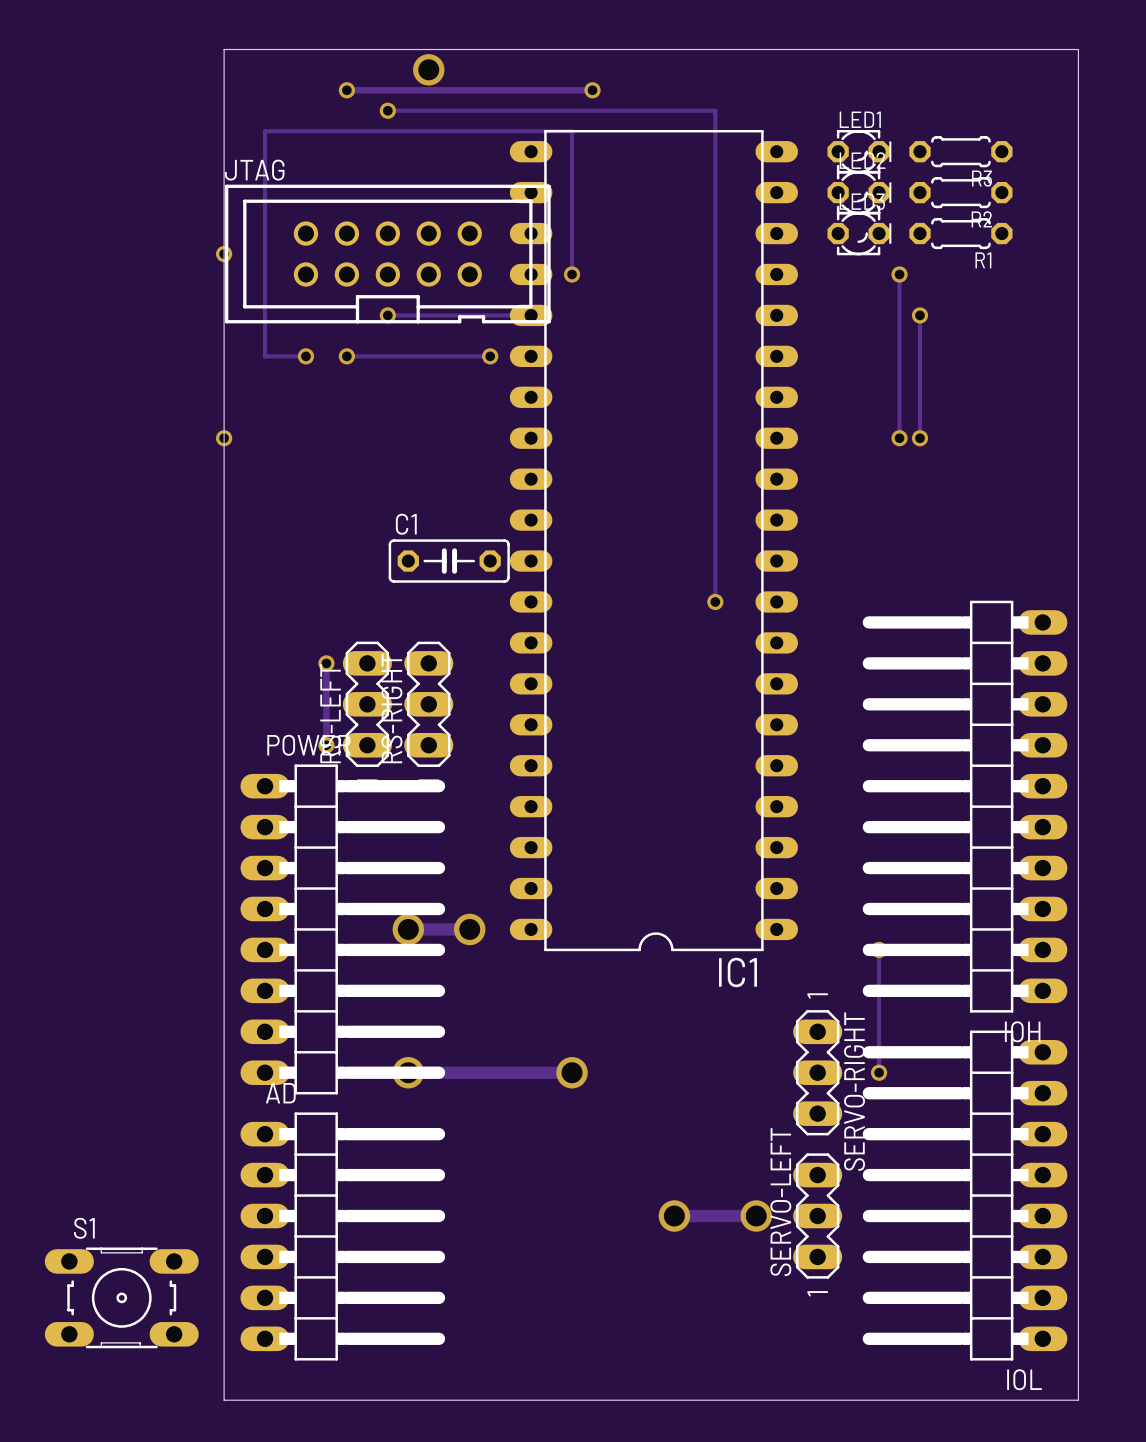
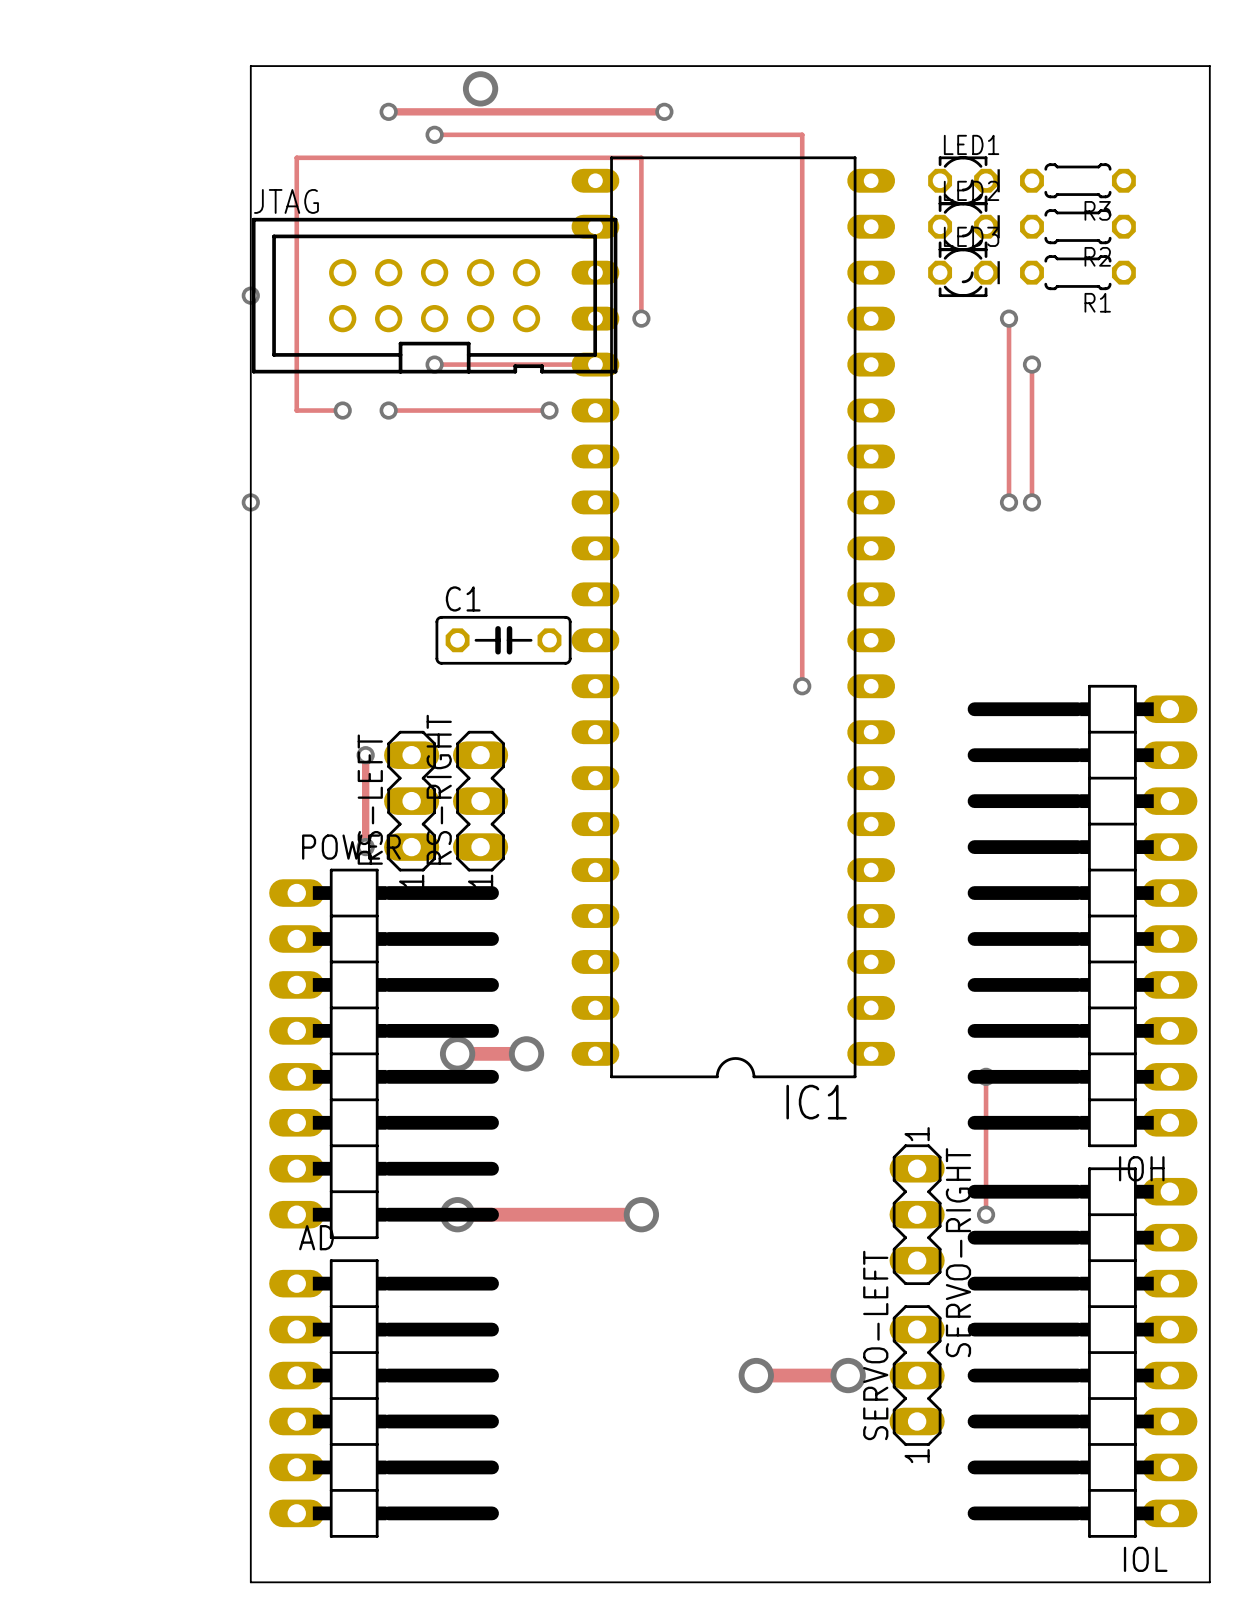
S1: (121, 1297) -> none

